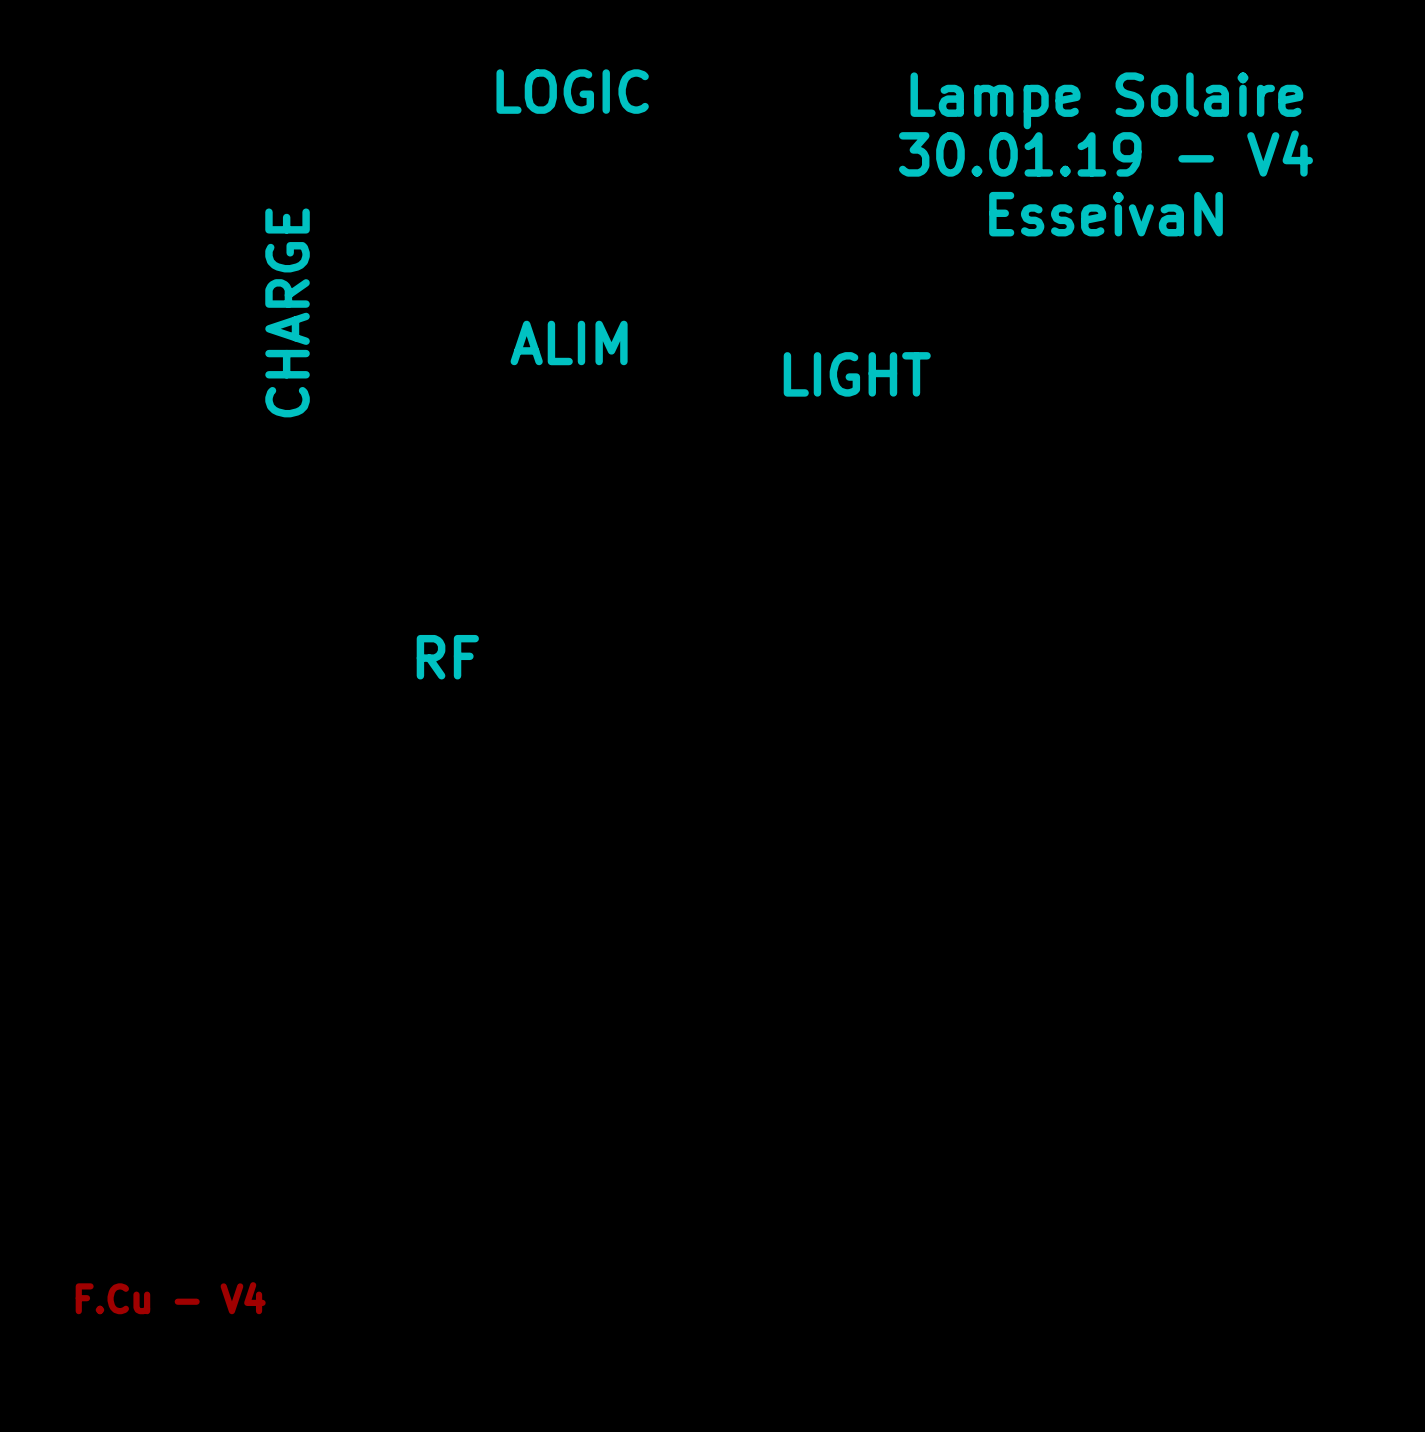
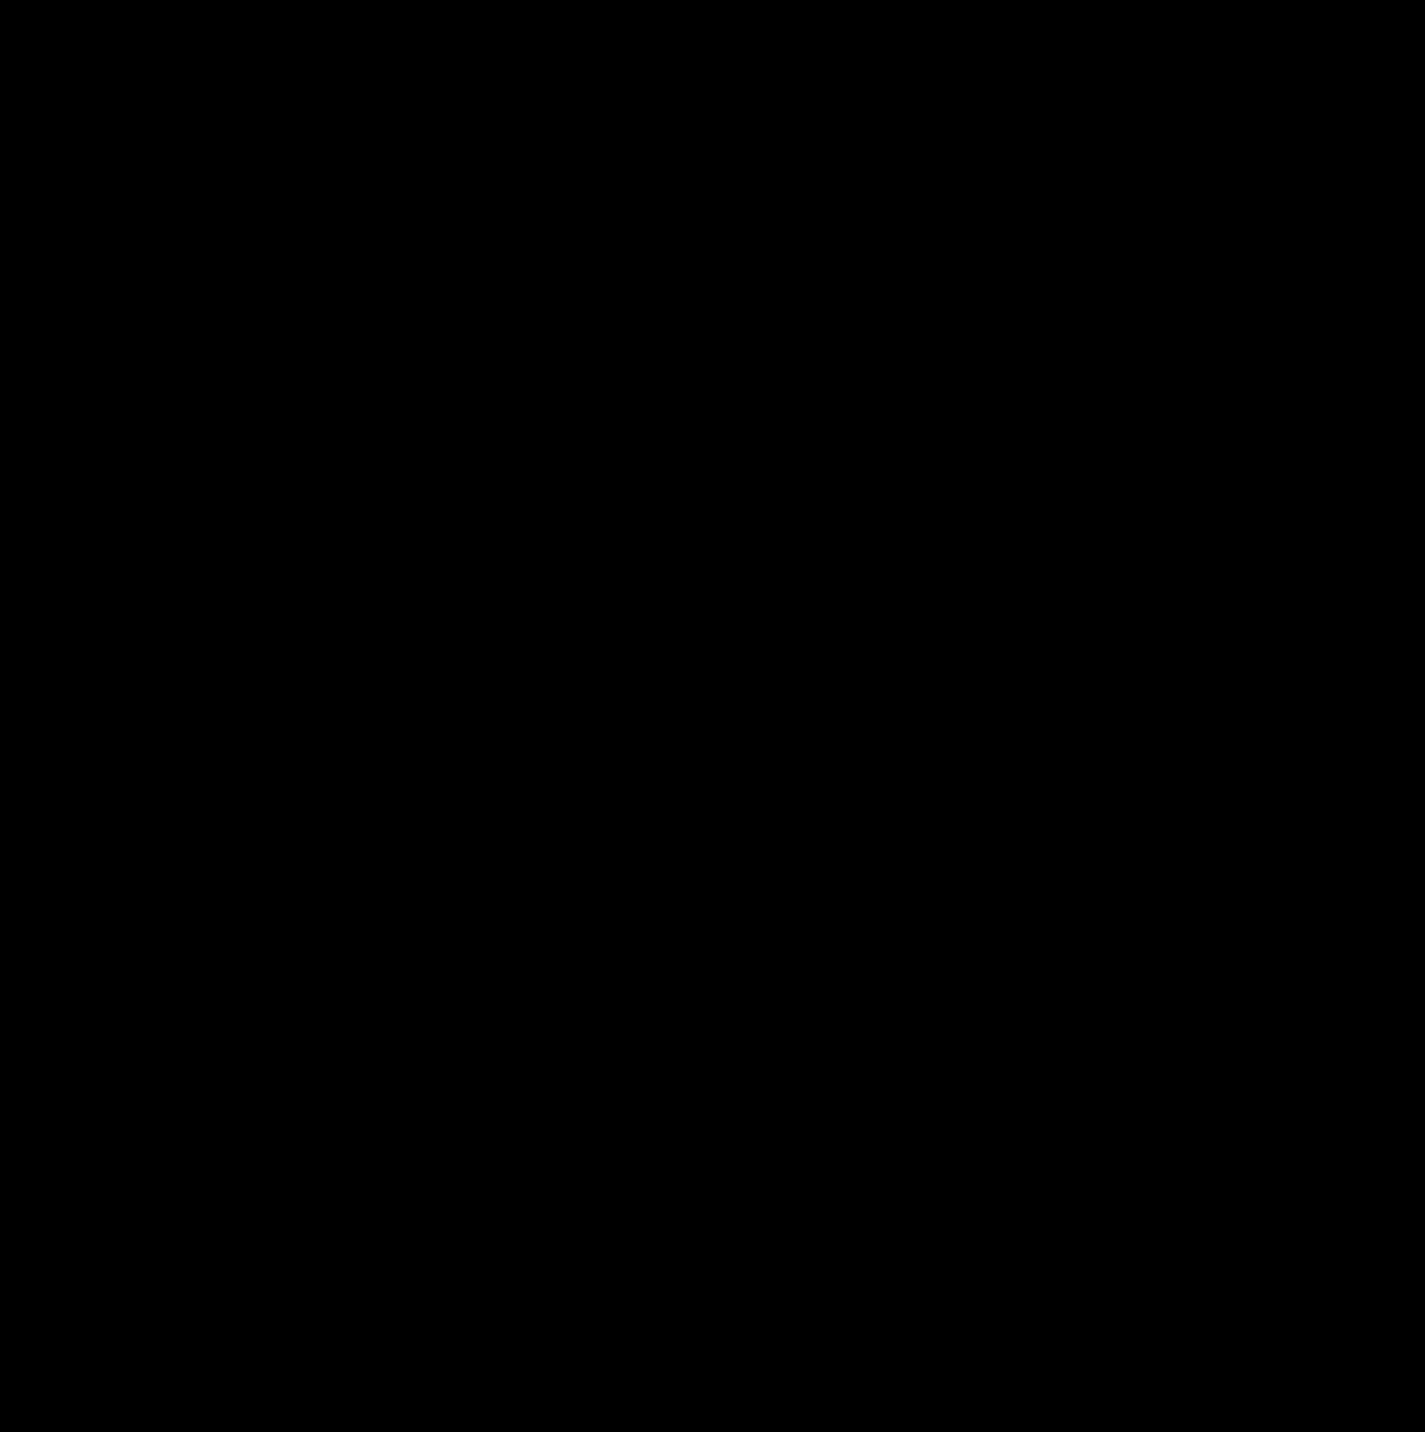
text: LOGIC (572, 91) -> none
text: Lampe Solaire (1106, 100) -> none
text: 30.01.19 - V4 (1106, 153) -> none
text: EsseivaN (1106, 214) -> none
text: CHARGE (287, 312) -> none
text: ALIM (569, 342) -> none
text: LIGHT (857, 374) -> none
text: RF (447, 657) -> none
text: F.Cu - V4 (170, 1298) -> none

